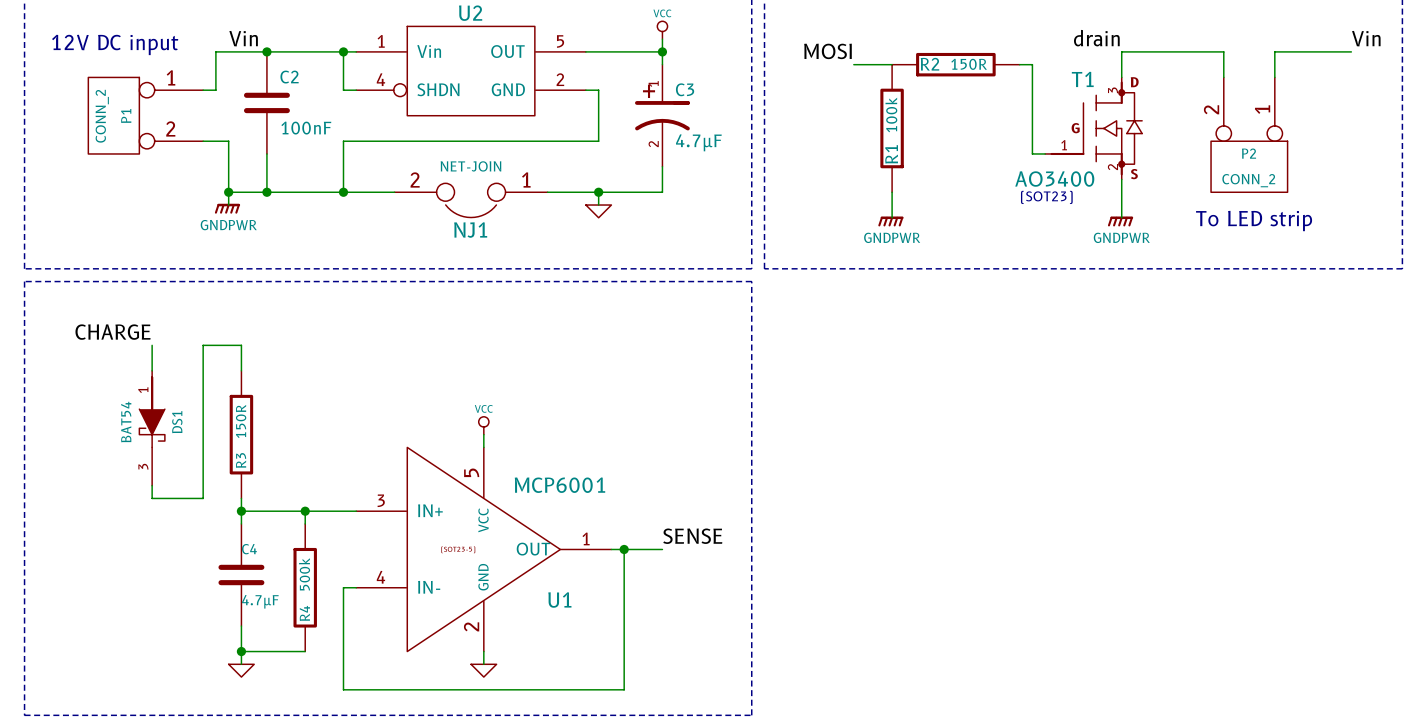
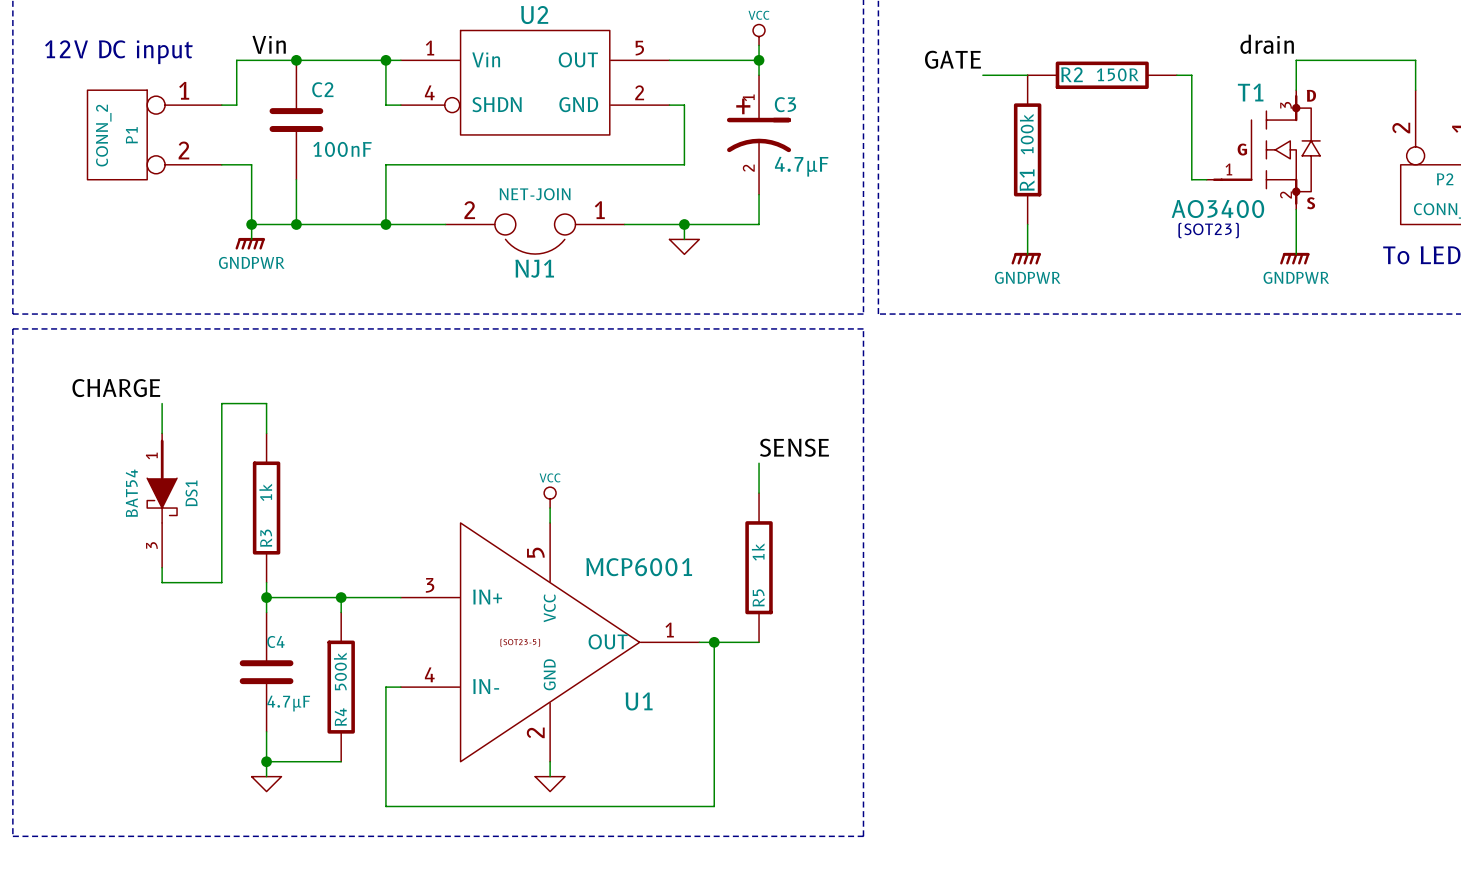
label: MOSI (827, 51) -> GATE (953, 59)
wire: none -> (759, 463) (759, 493)
R3 value: 150R (241, 421) -> 1k (265, 492)
R5: none -> 1k (759, 567)
label position: SENSE (692, 536) -> SENSE (794, 447)

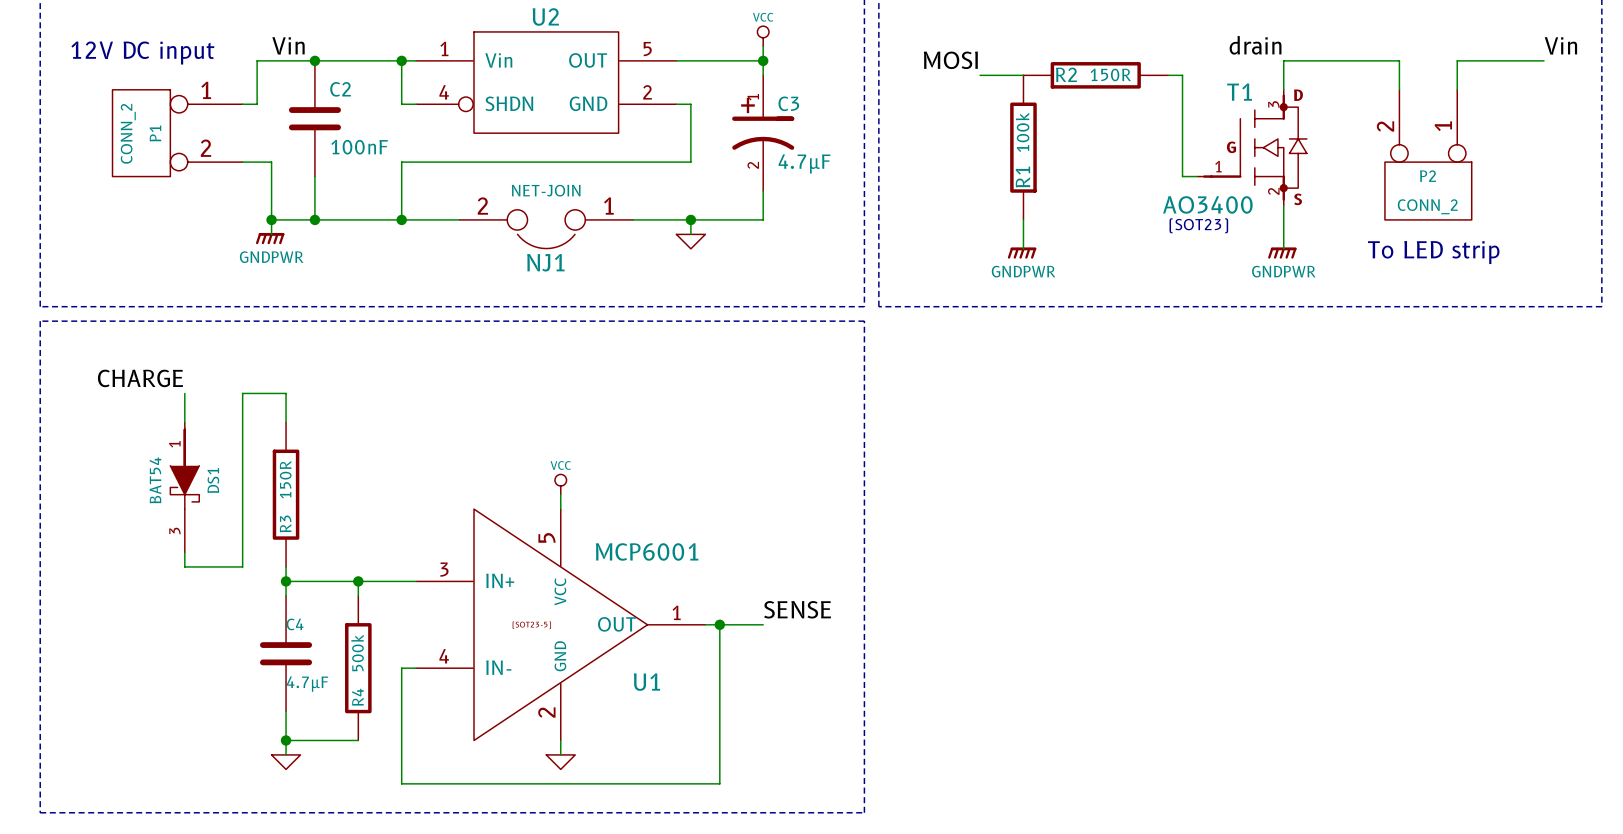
label: GATE (953, 59) -> MOSI (950, 60)
label position: SENSE (794, 447) -> SENSE (797, 609)
wire: (759, 463) (759, 493) -> none
R3 value: 1k (265, 492) -> 150R (285, 479)
R5: 1k (759, 567) -> none

